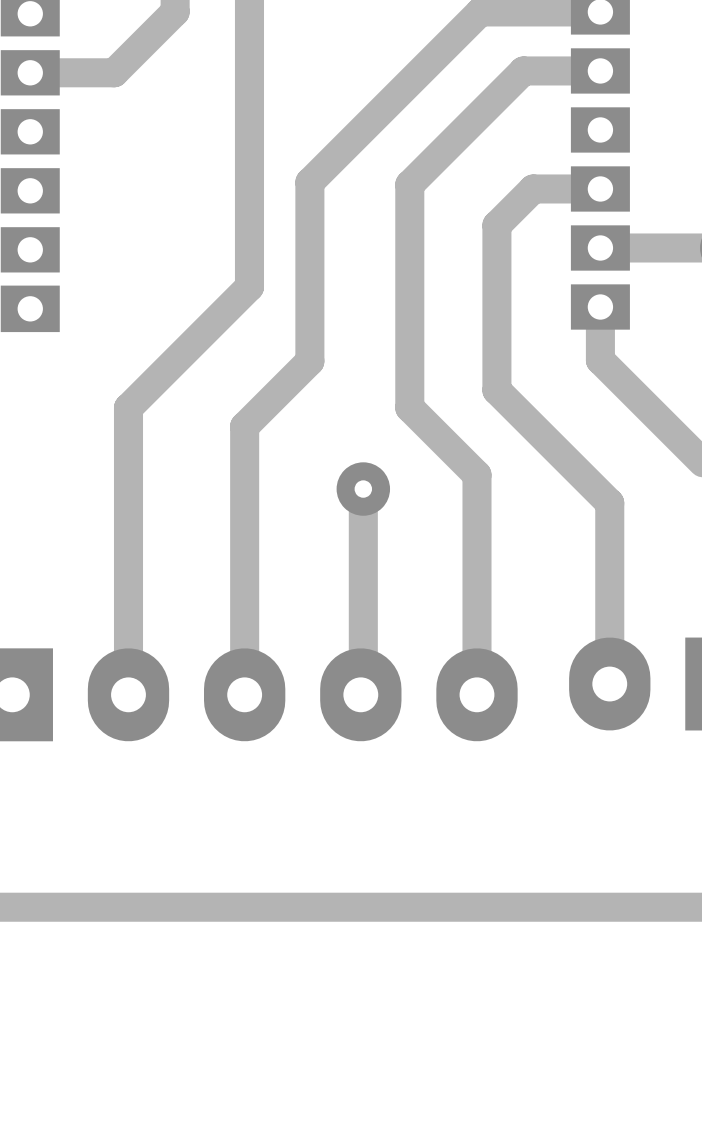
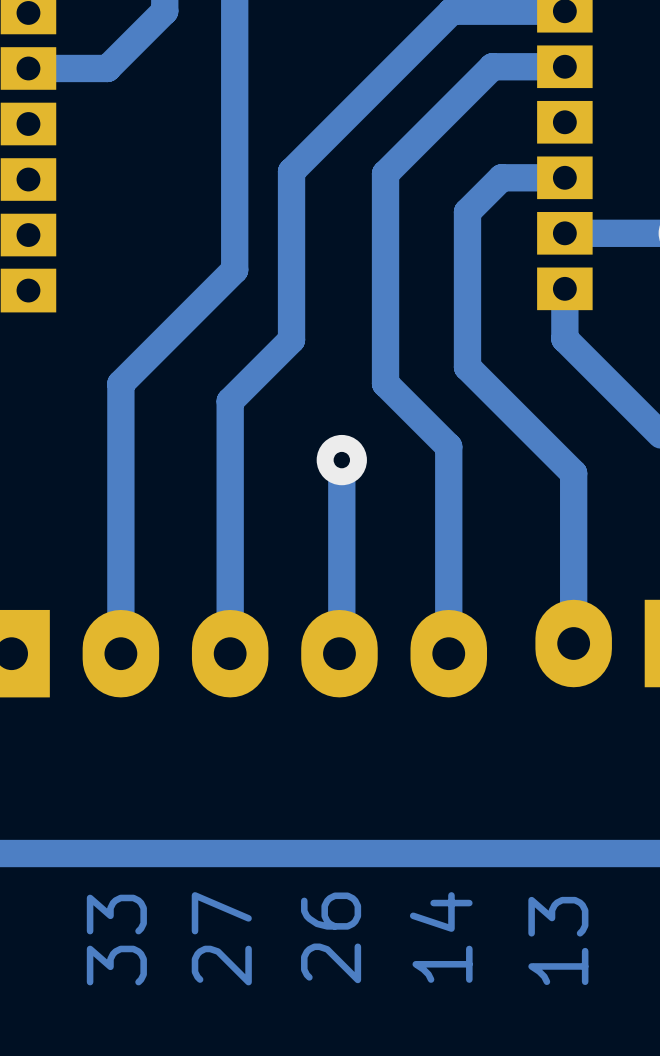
text: none -> 26 (331, 937)
text: none -> 14 (441, 937)
text: none -> 27 (221, 938)
text: none -> 33 (116, 940)
text: none -> 13 (558, 940)

